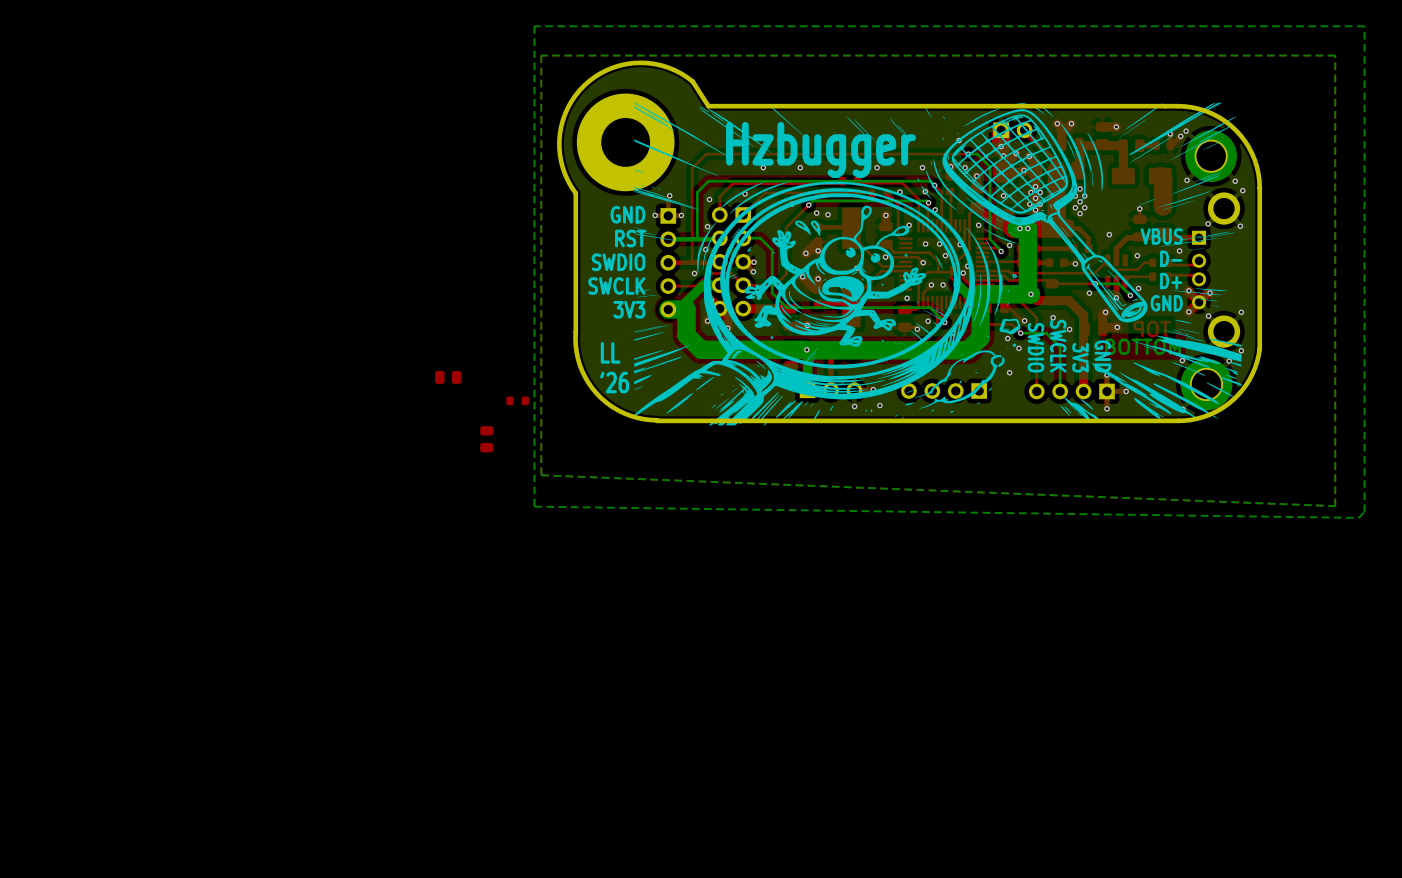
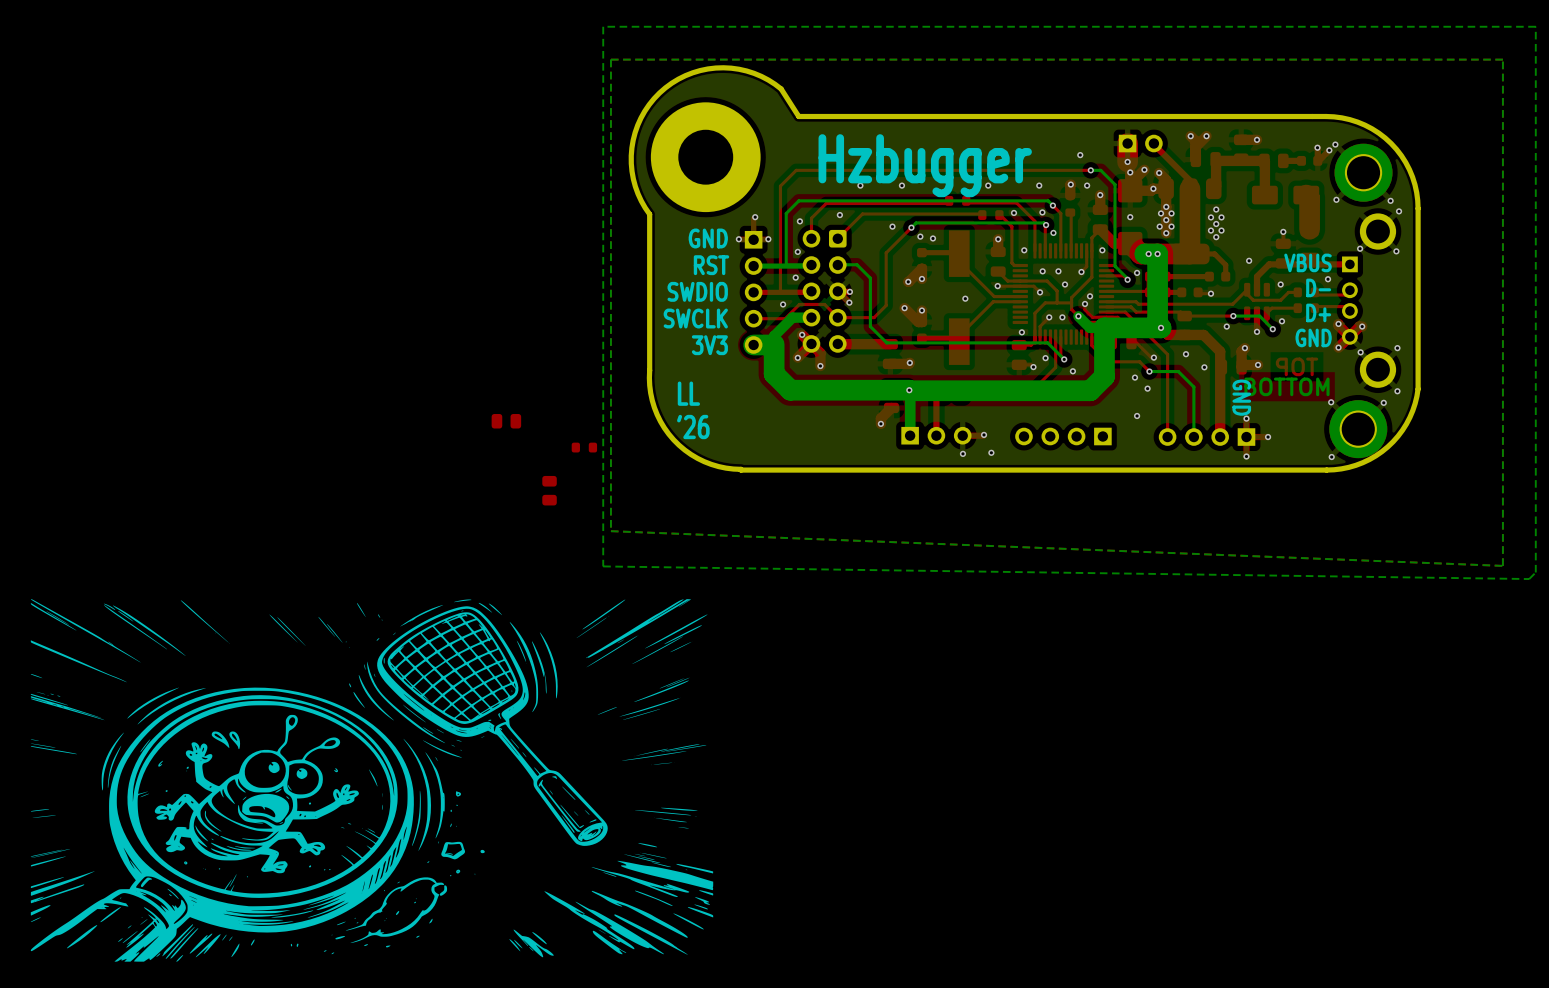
drawing: [634, 102, 1242, 426] -> none
text: SWCLK (1058, 346) -> none
text: SWDIO (1036, 347) -> none
text: 3V3 (1080, 357) -> none
drawing: none -> [30, 599, 714, 962]

